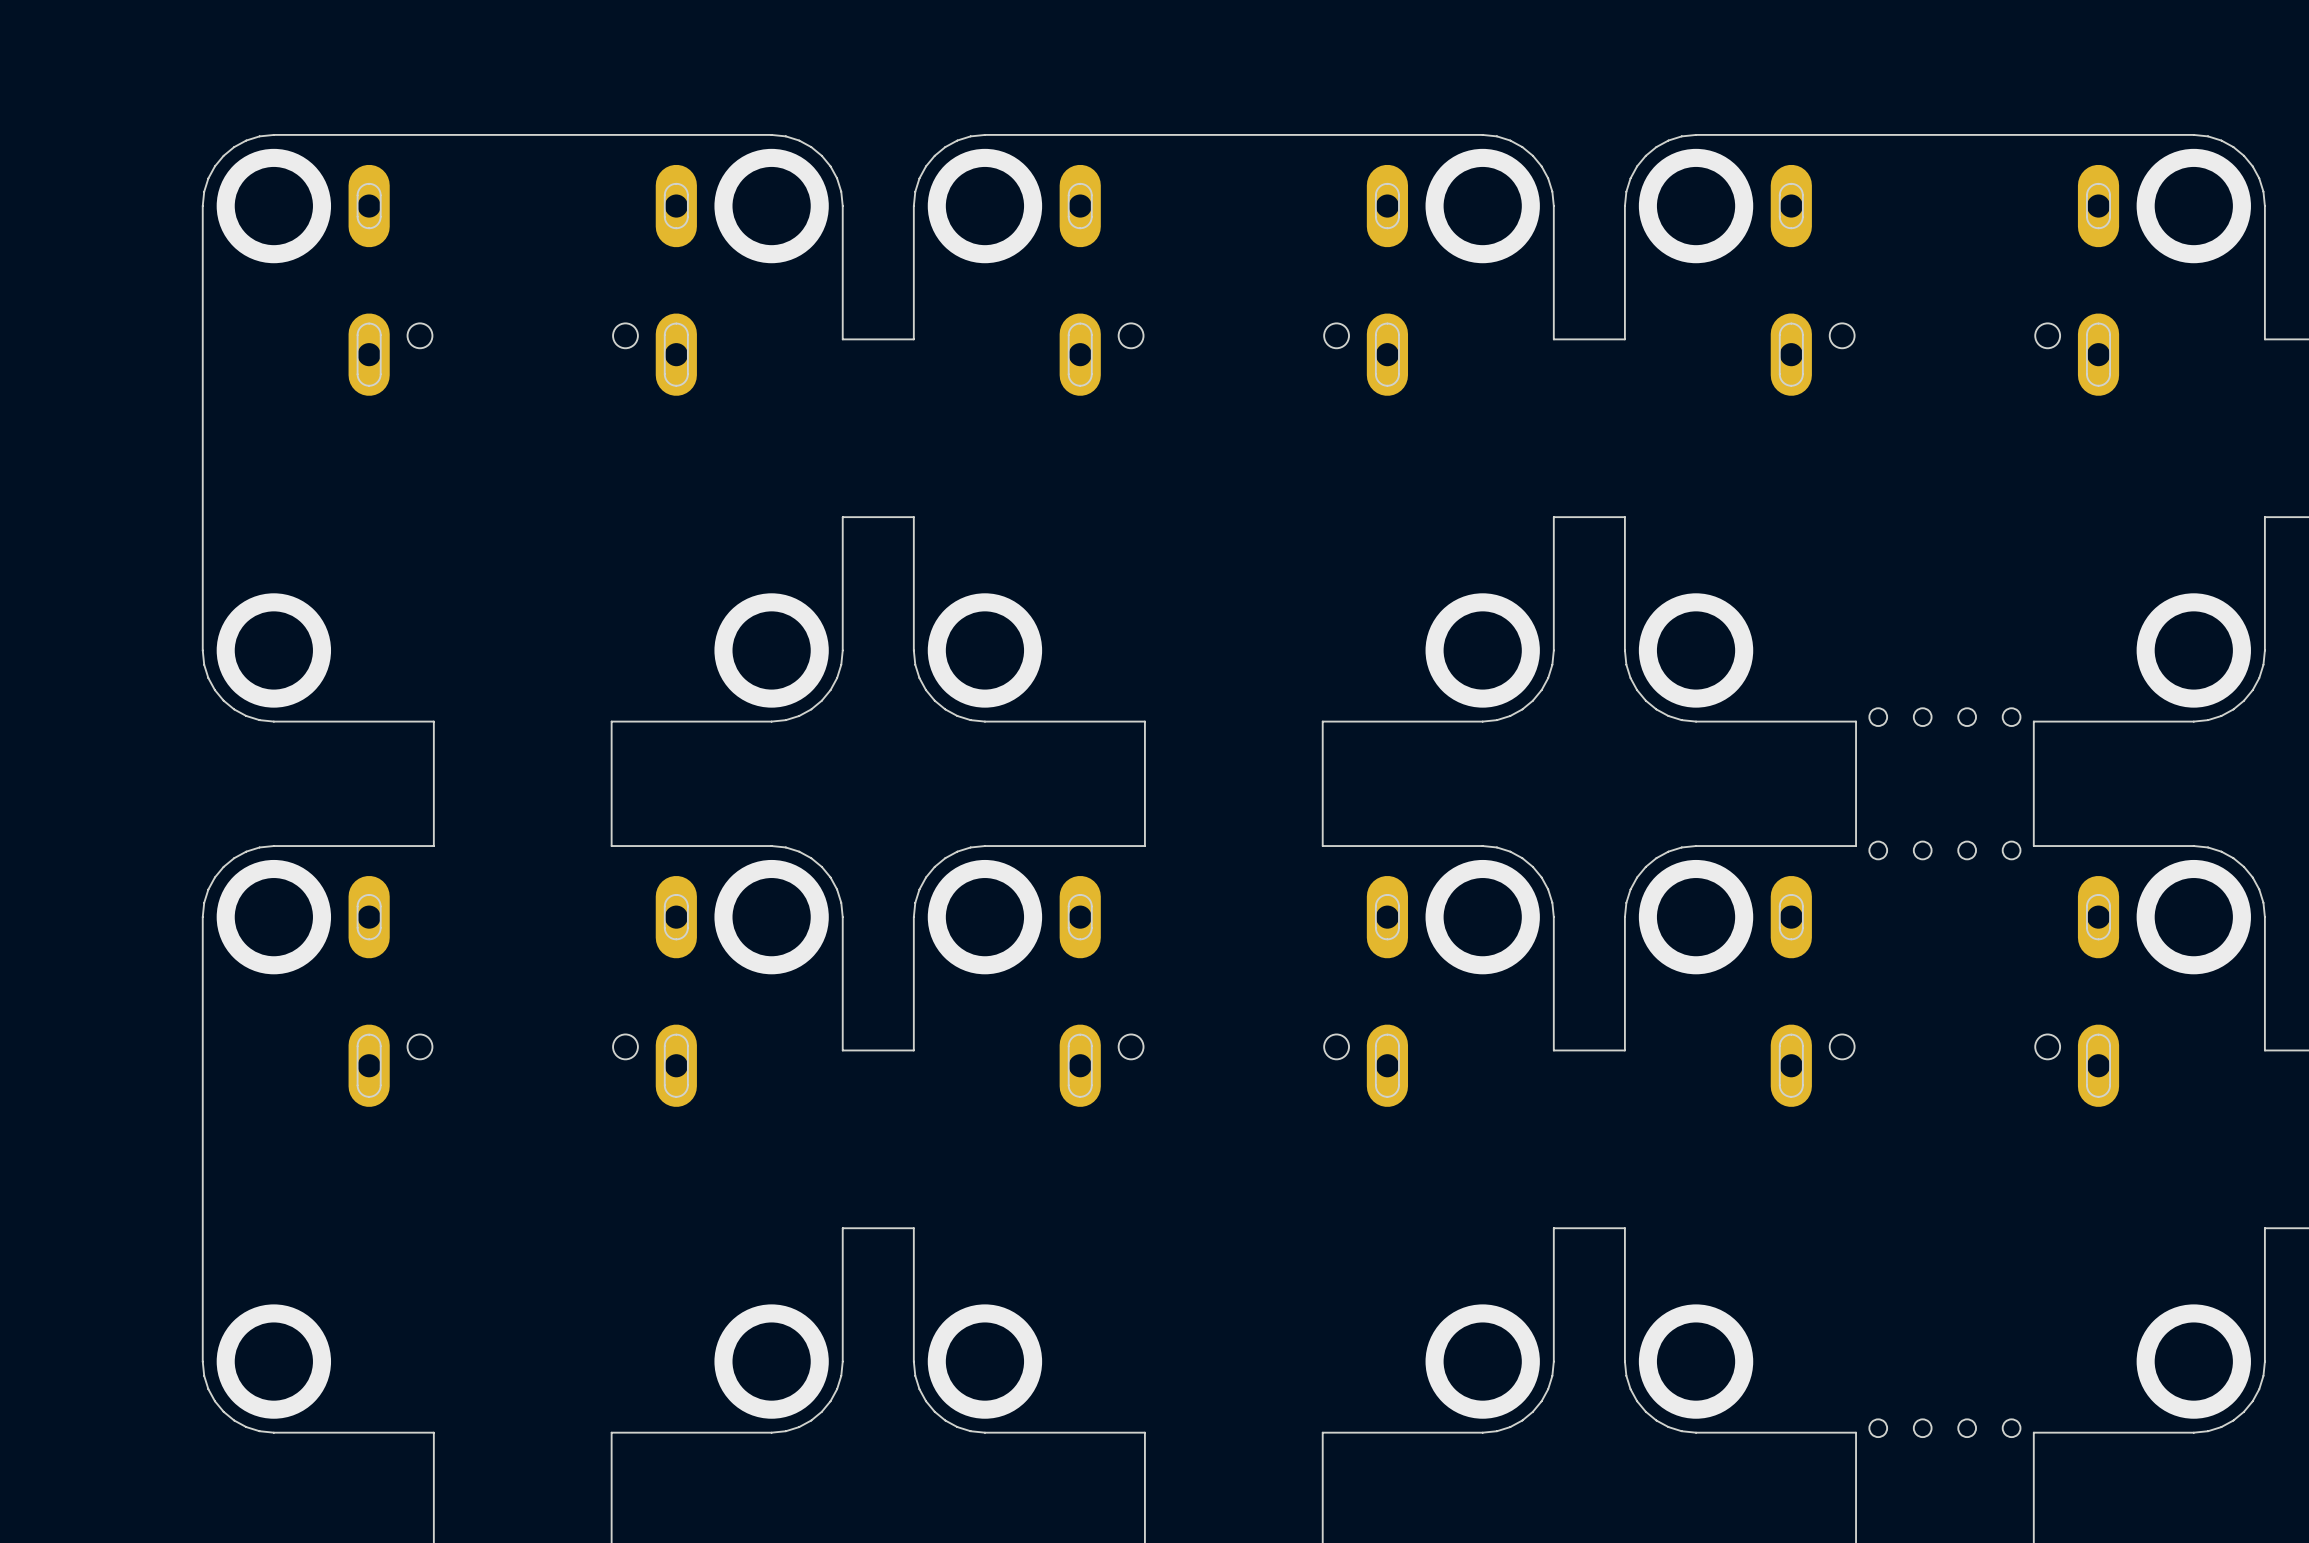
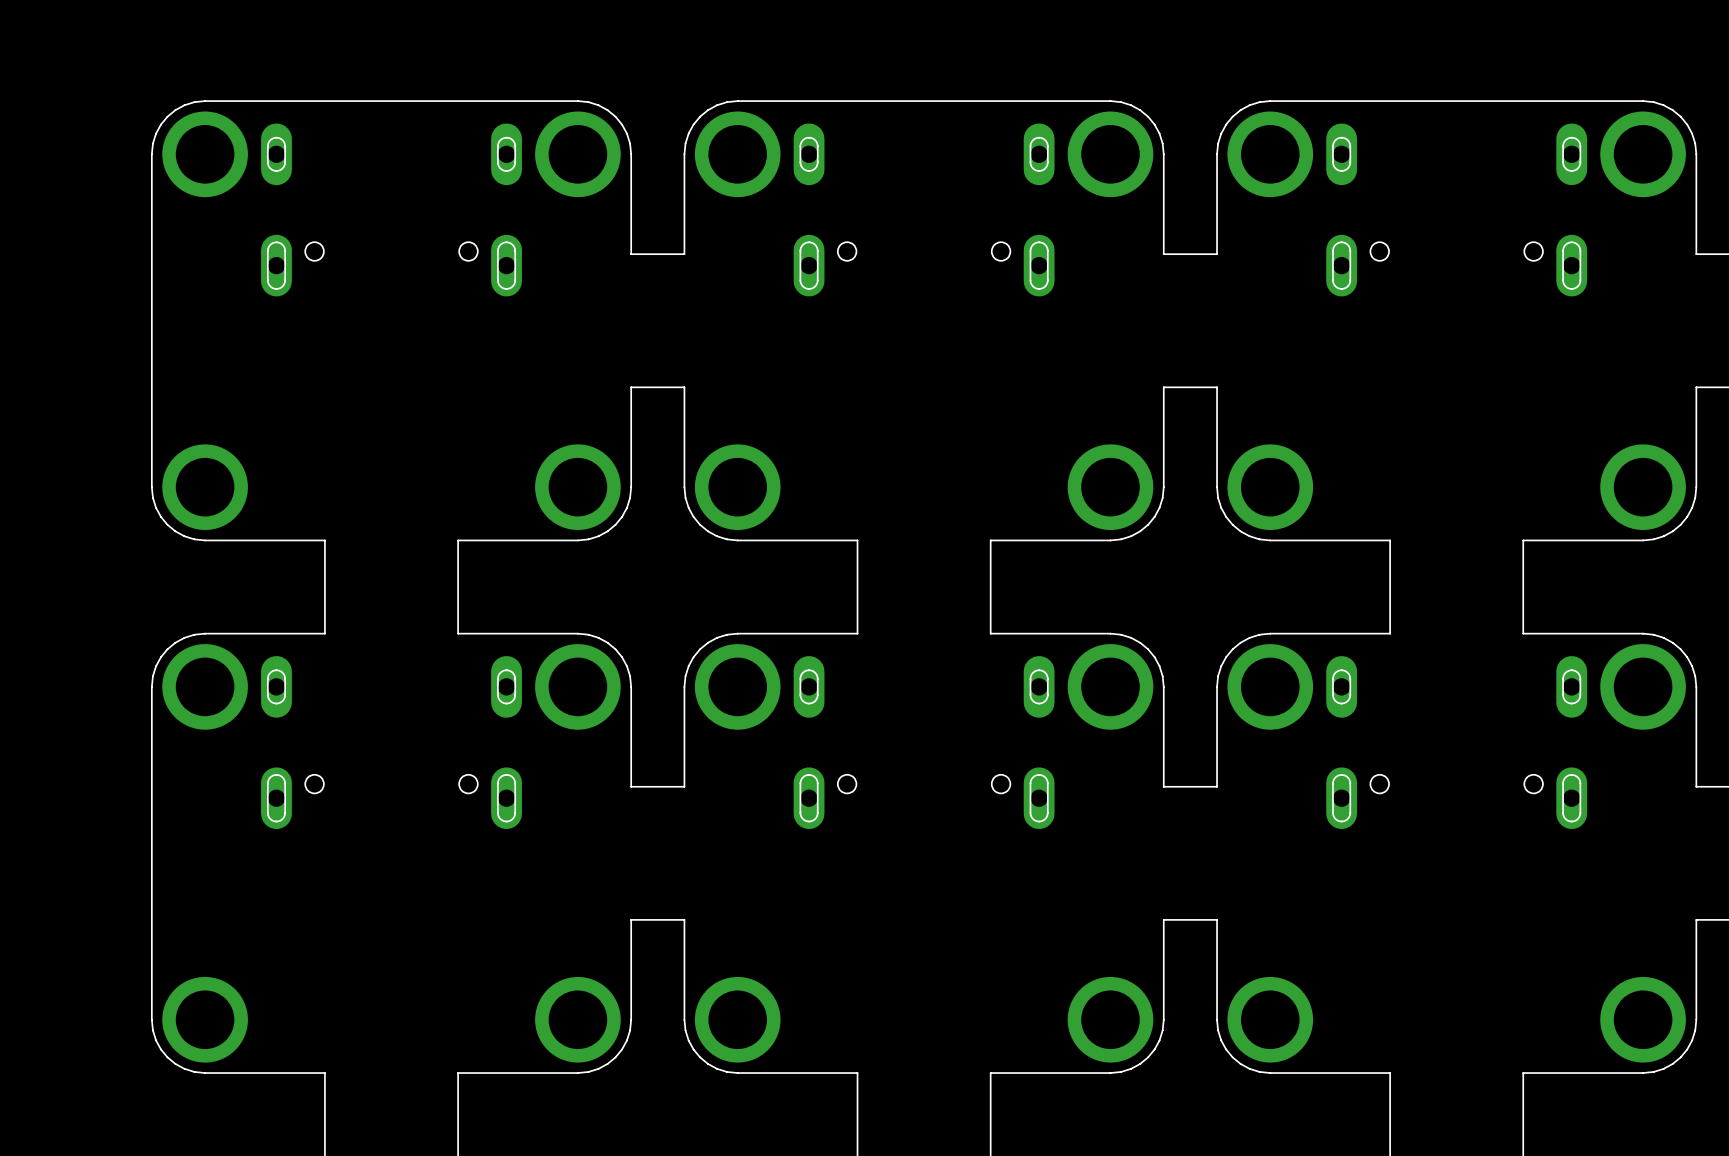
round board edge: [1869, 708, 1888, 727] -> none
round board edge: [1913, 708, 1932, 727] -> none
round board edge: [1958, 708, 1977, 727] -> none
round board edge: [2002, 708, 2021, 727] -> none
round board edge: [1869, 841, 1888, 860] -> none
round board edge: [1913, 841, 1932, 860] -> none
round board edge: [1958, 841, 1977, 860] -> none
round board edge: [2002, 841, 2021, 860] -> none
round board edge: [1869, 1419, 1888, 1438] -> none
round board edge: [1913, 1419, 1932, 1438] -> none
round board edge: [1958, 1419, 1977, 1438] -> none
round board edge: [2002, 1419, 2021, 1438] -> none

